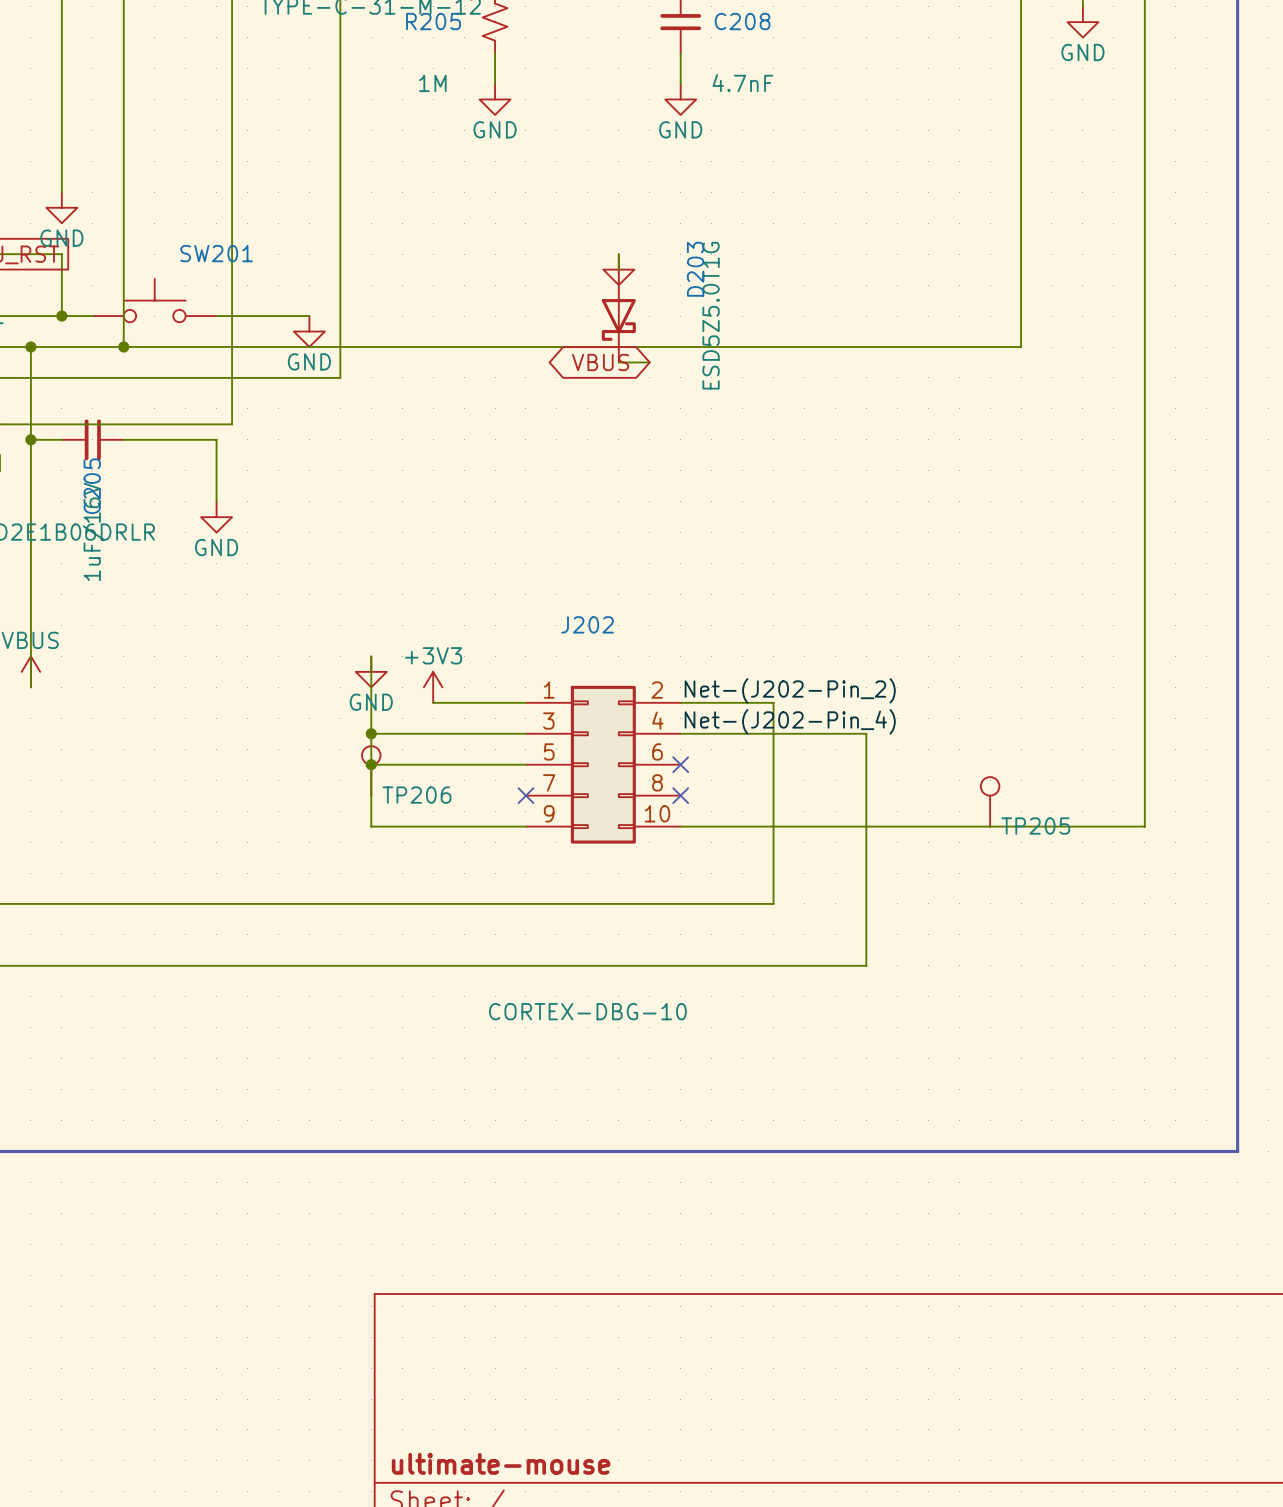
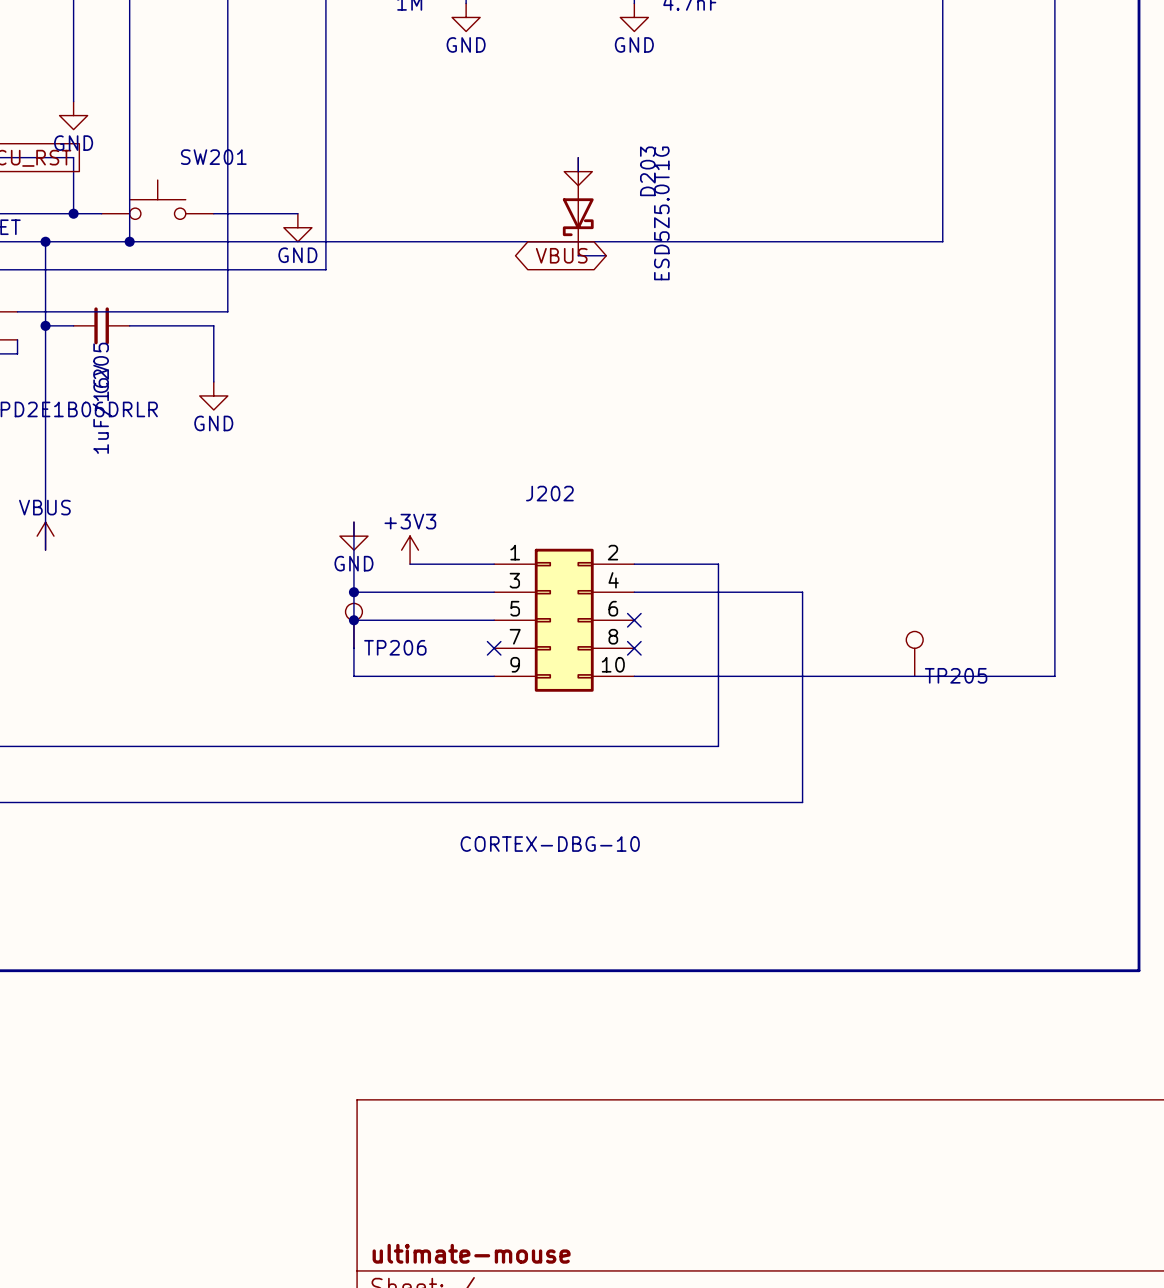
label: Net-(J202-Pin_2) (790, 690) -> none
label: Net-(J202-Pin_4) (790, 721) -> none

